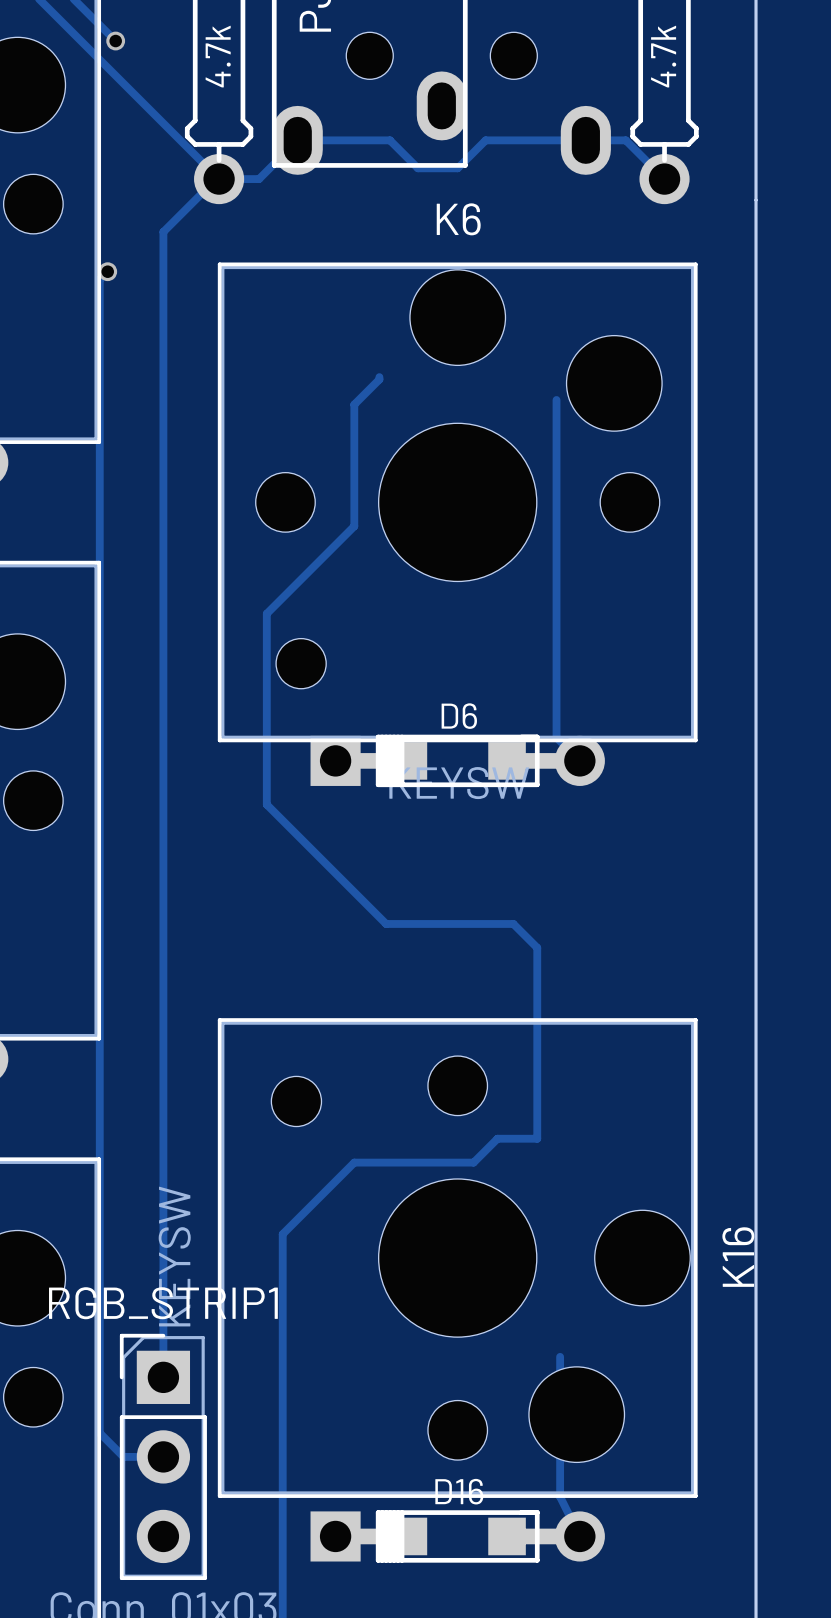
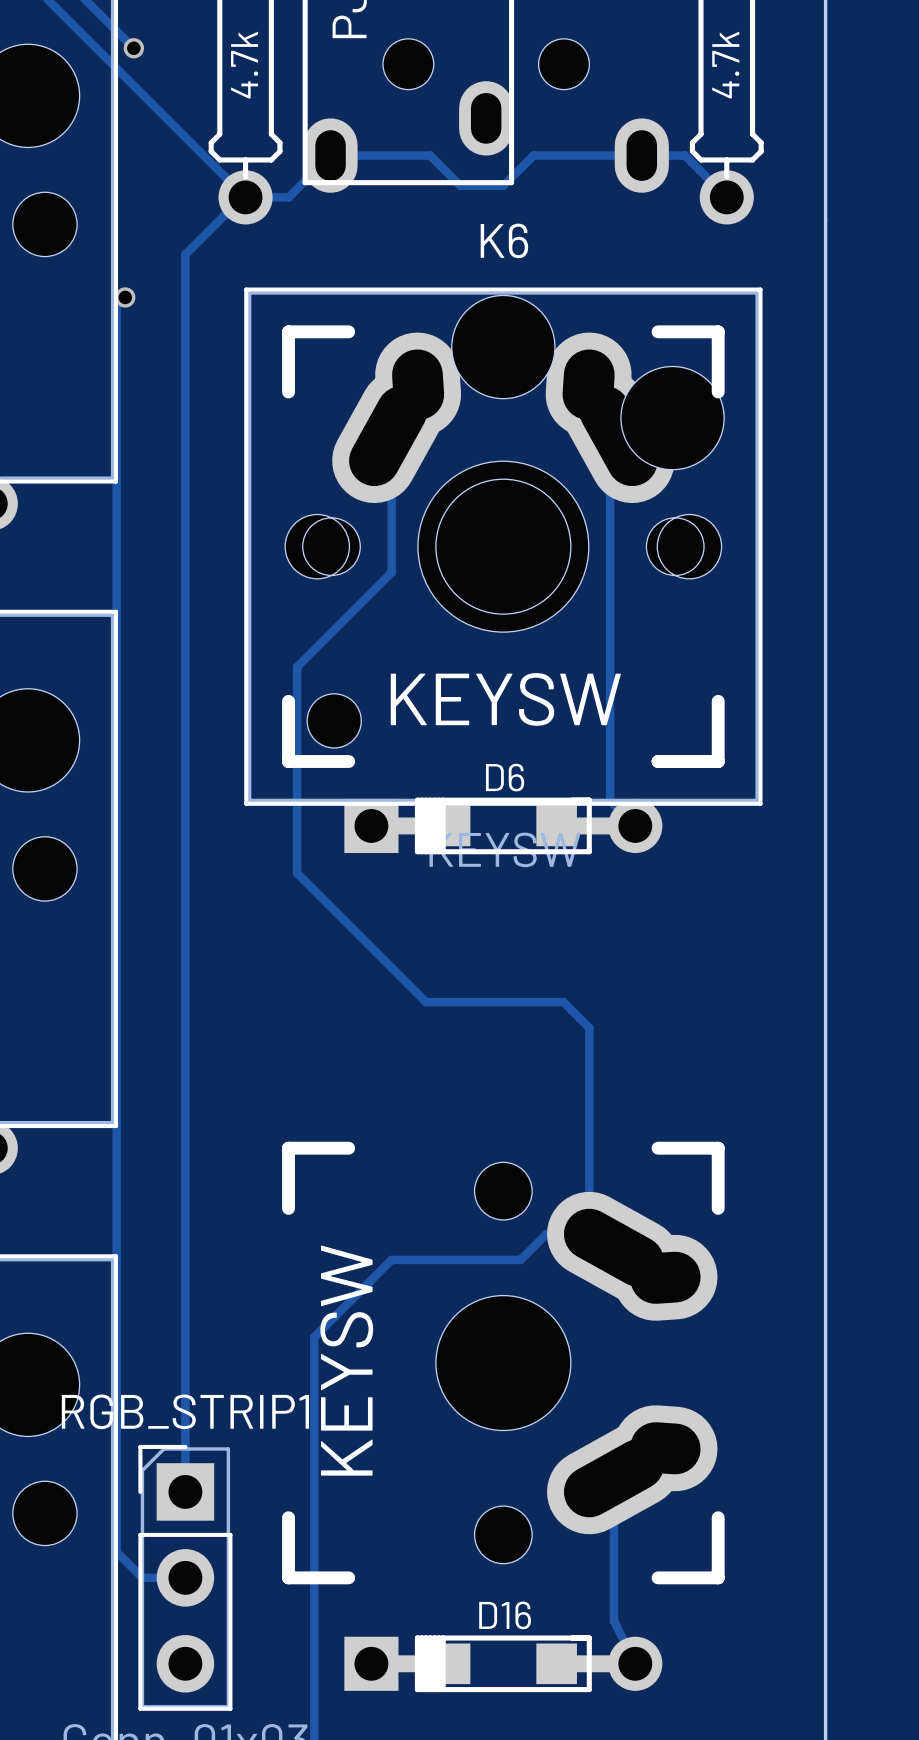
part: none -> KEYSW (503, 546)
K16: KEYSW (457, 1258) -> none
part: none -> KEYSW (503, 1363)

